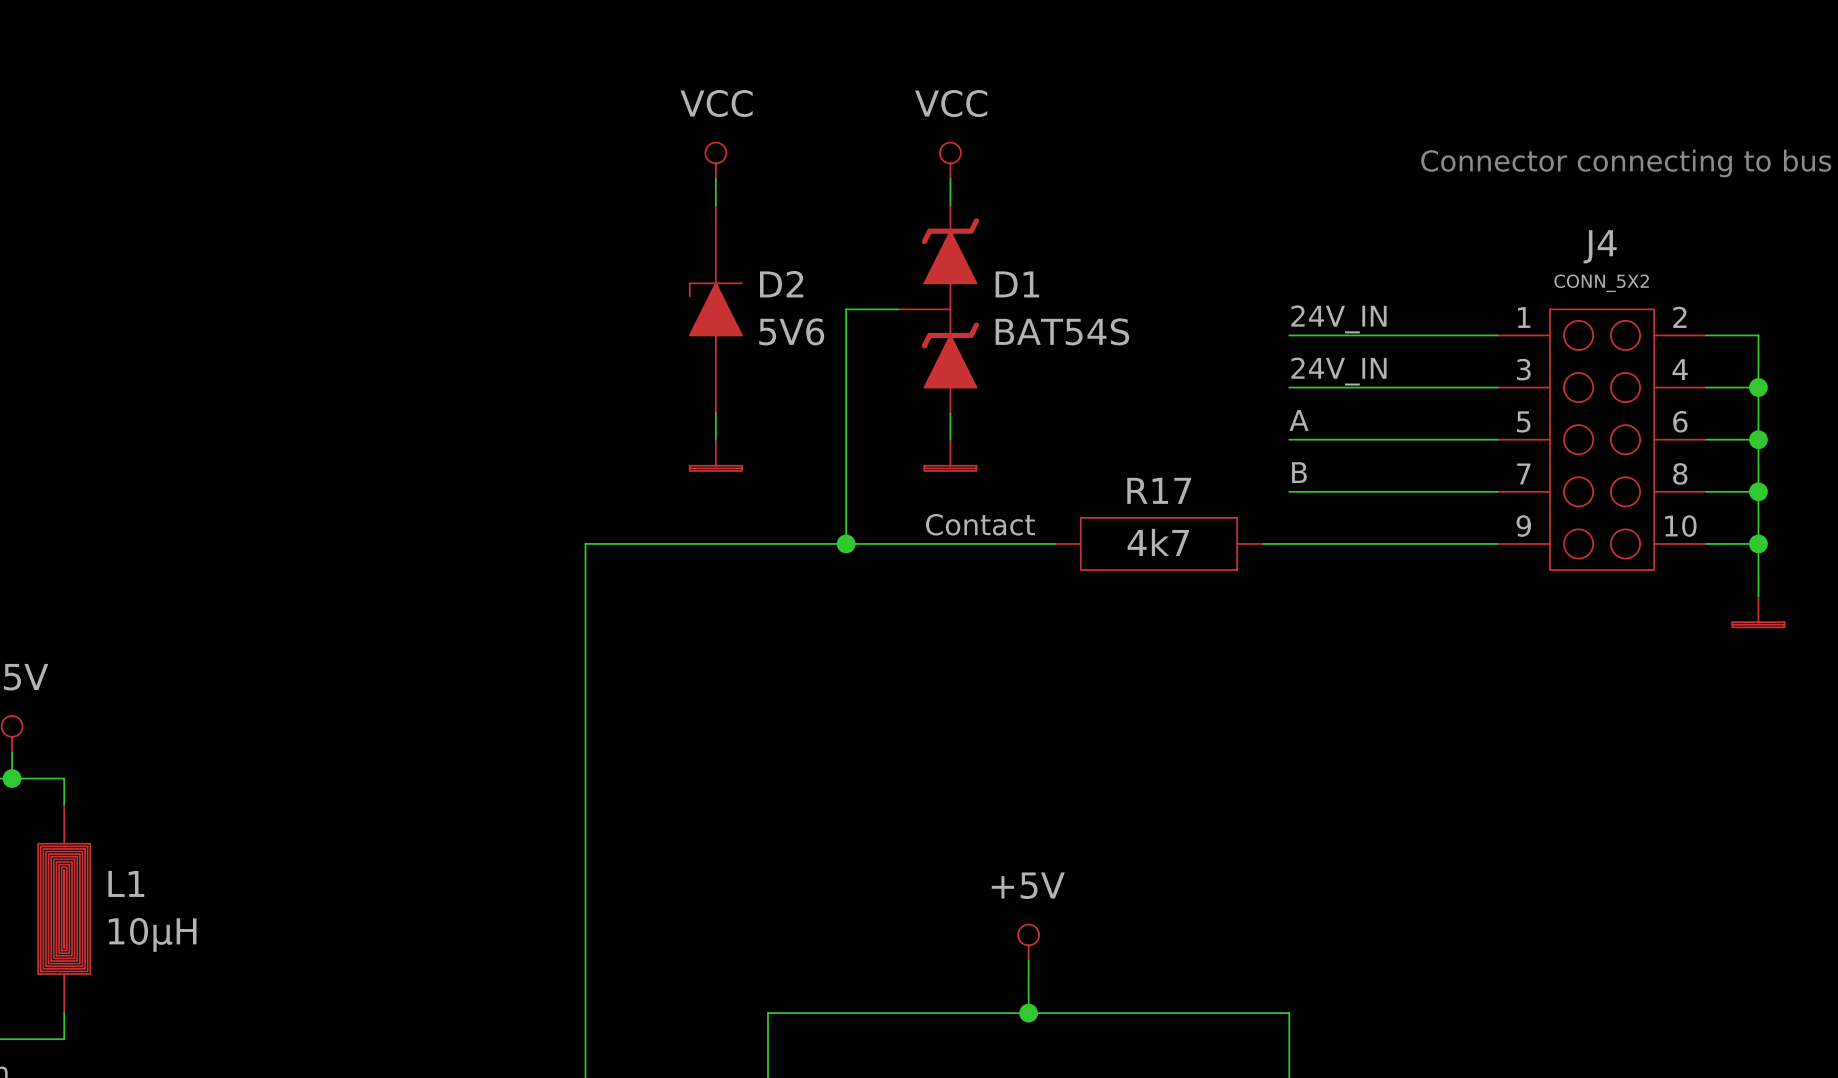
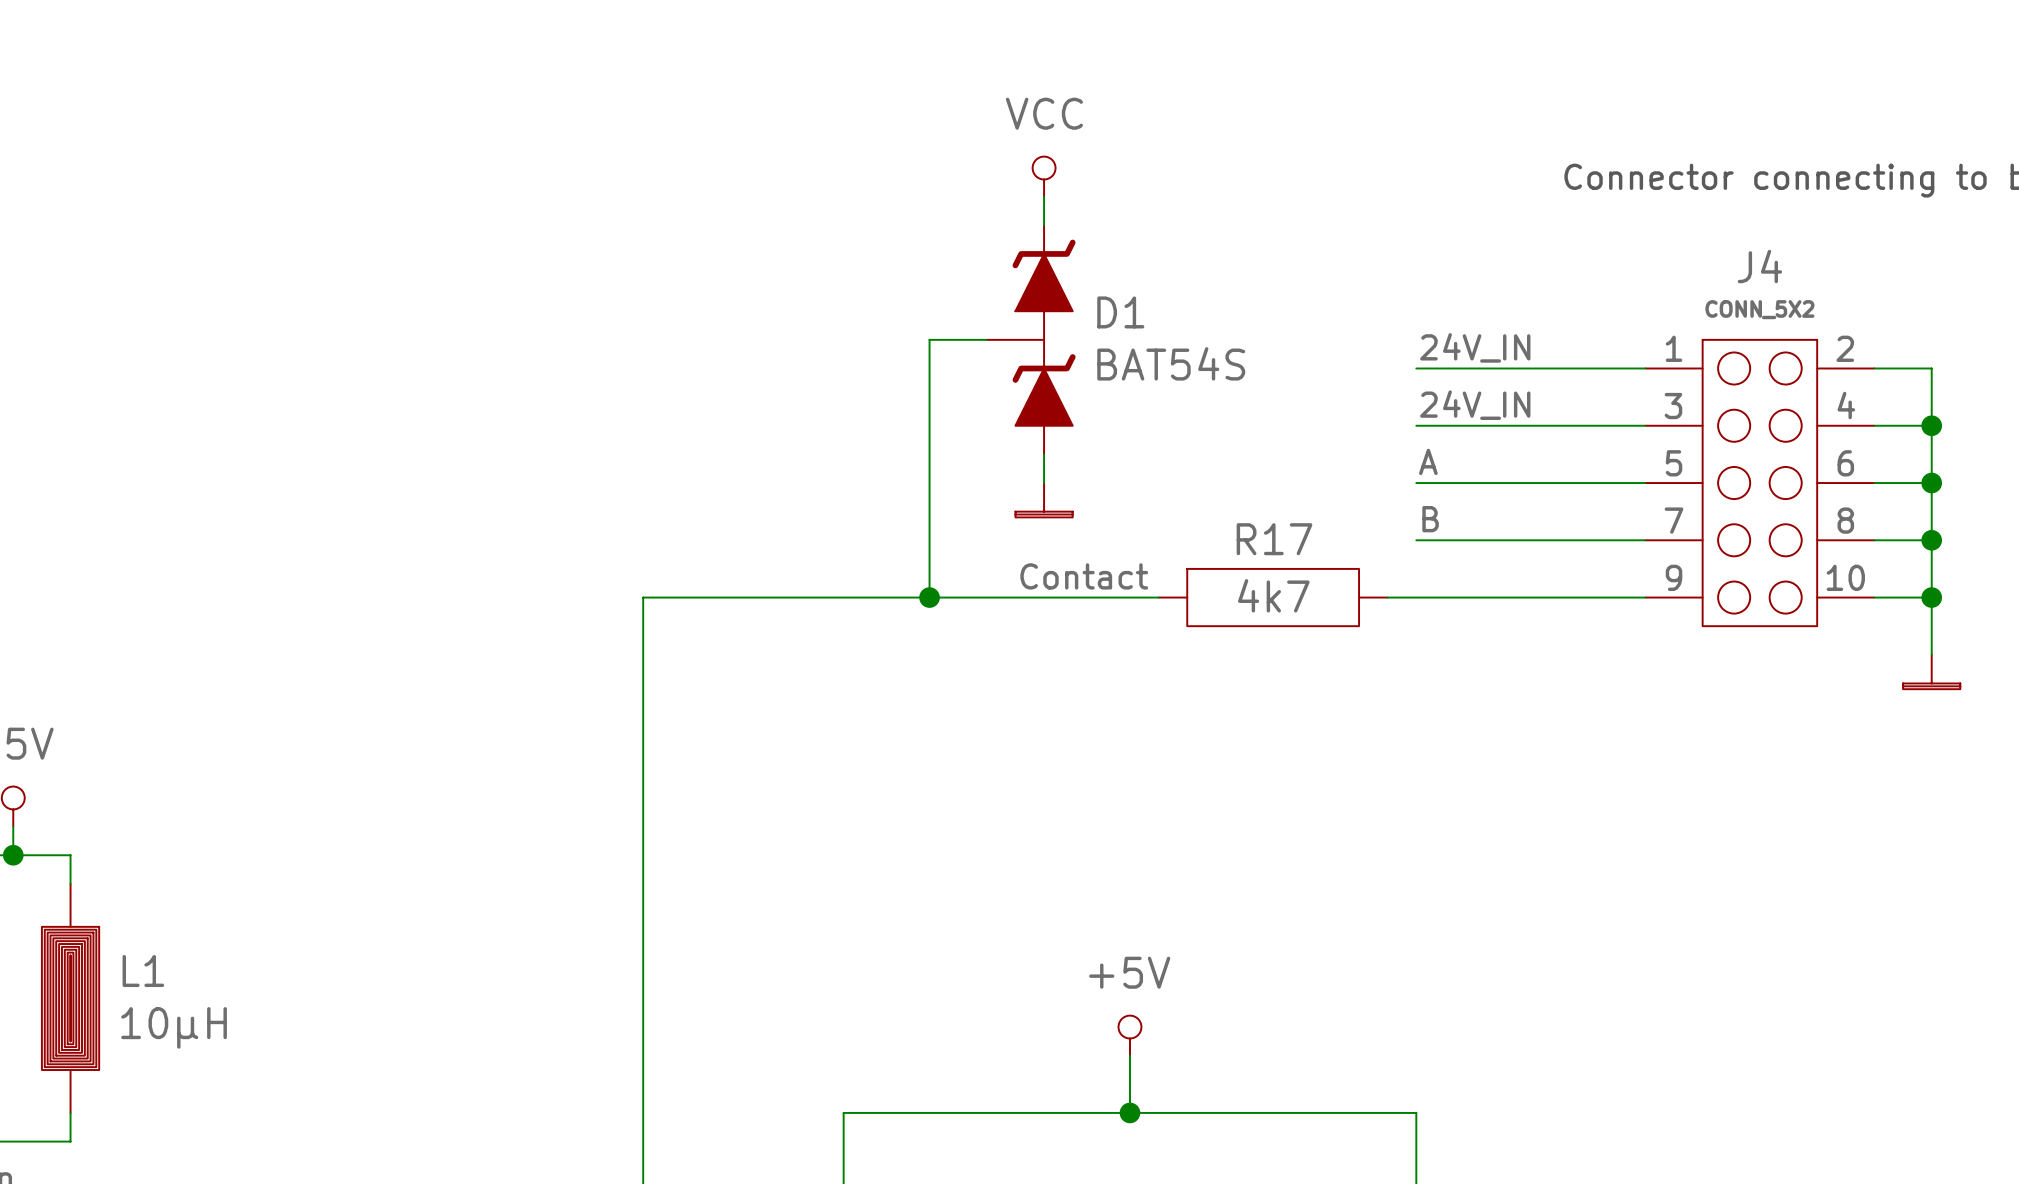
power symbol: VCC (715, 160) -> none
wire: (715, 179) (715, 205) -> none
D2: 5V6 (715, 309) -> none
wire: (715, 413) (715, 439) -> none
power symbol: (715, 455) -> none

